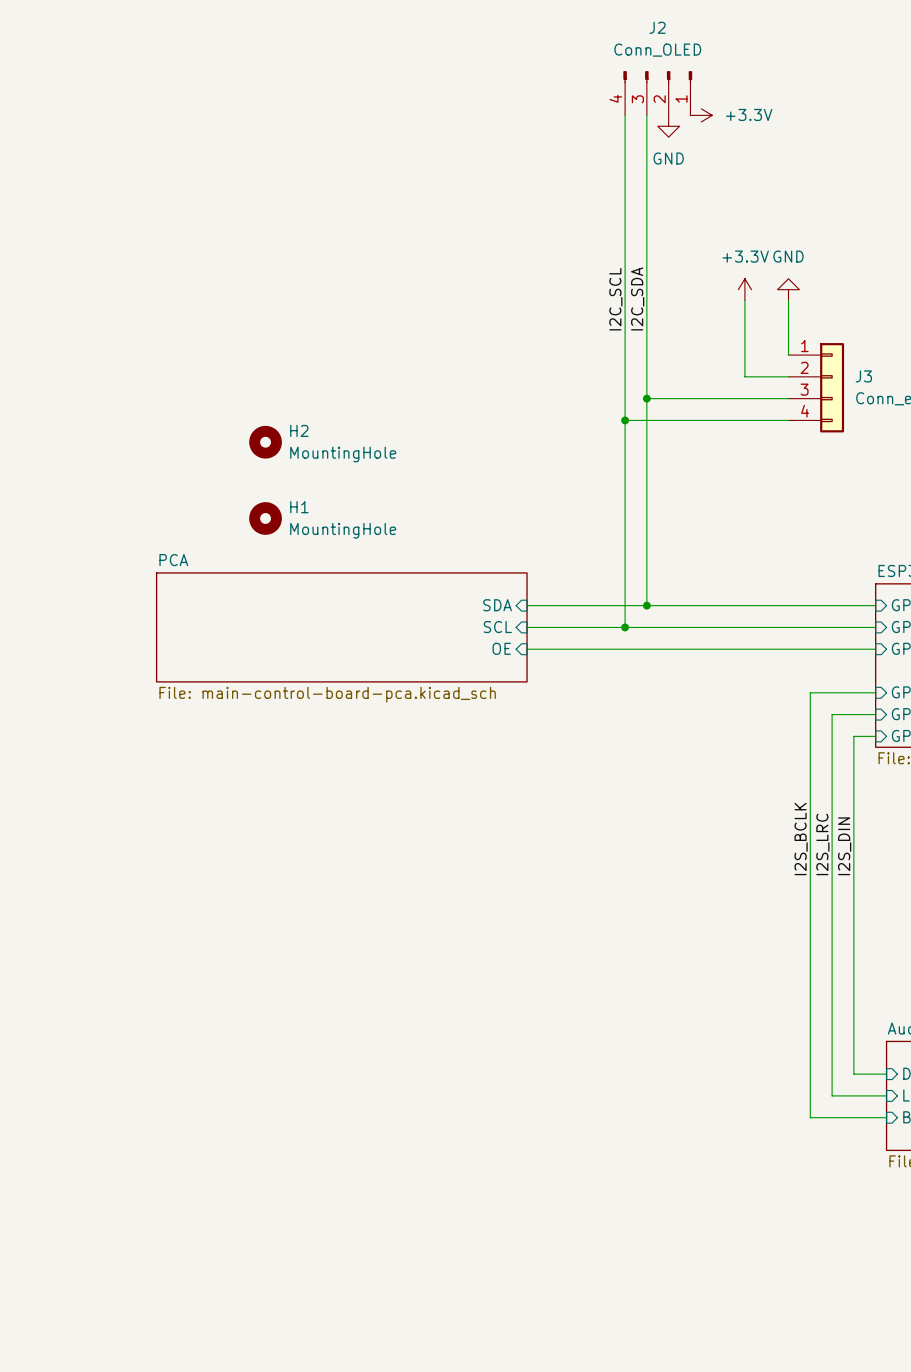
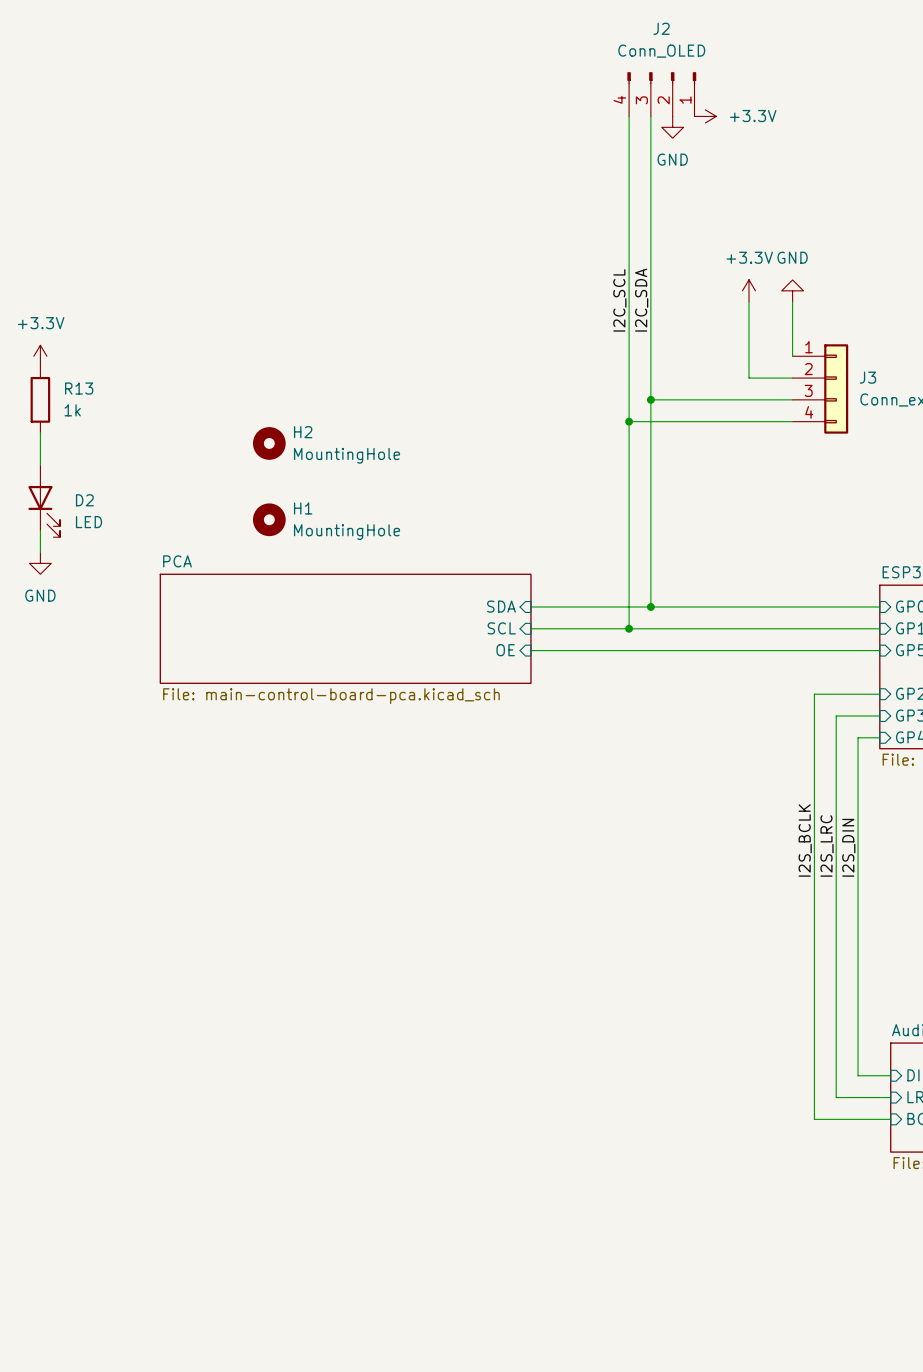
power symbol: none -> +3.3V (40, 356)
R13: none -> 1k (40, 399)
wire: none -> (40, 432) (40, 465)
D2: none -> LED (44, 501)
wire: none -> (40, 530) (40, 552)
power symbol: none -> GND (40, 563)

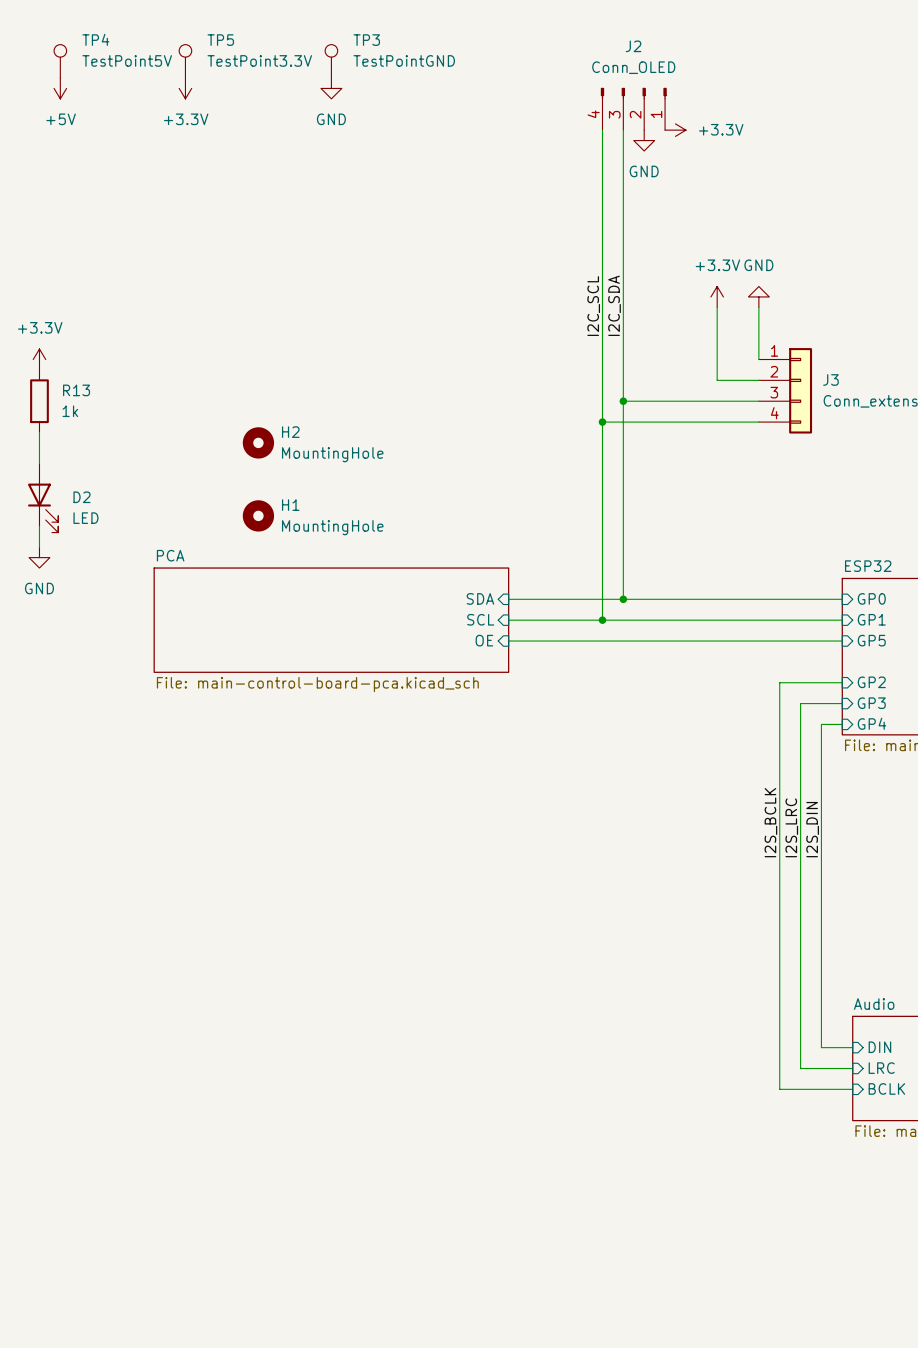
TP4: none -> TestPoint5V (60, 61)
TP5: none -> TestPoint3.3V (185, 61)
TP3: none -> TestPointGND (331, 61)
power symbol: none -> +5V (60, 88)
power symbol: none -> +3.3V (185, 88)
power symbol: none -> GND (331, 88)

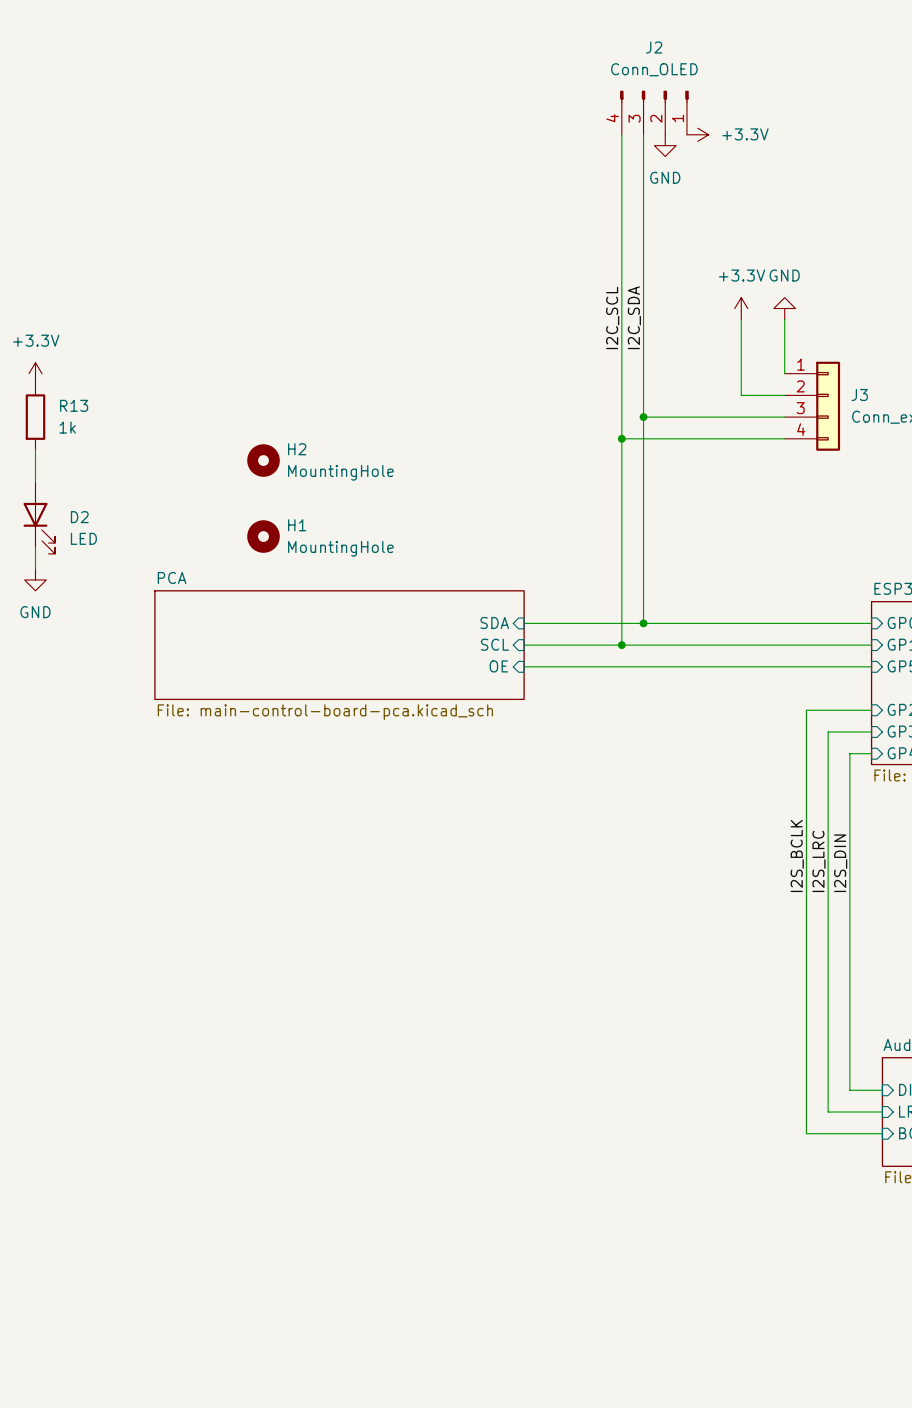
TP4: TestPoint5V (60, 61) -> none
TP5: TestPoint3.3V (185, 61) -> none
TP3: TestPointGND (331, 61) -> none
power symbol: +5V (60, 88) -> none
power symbol: +3.3V (185, 88) -> none
power symbol: GND (331, 88) -> none

